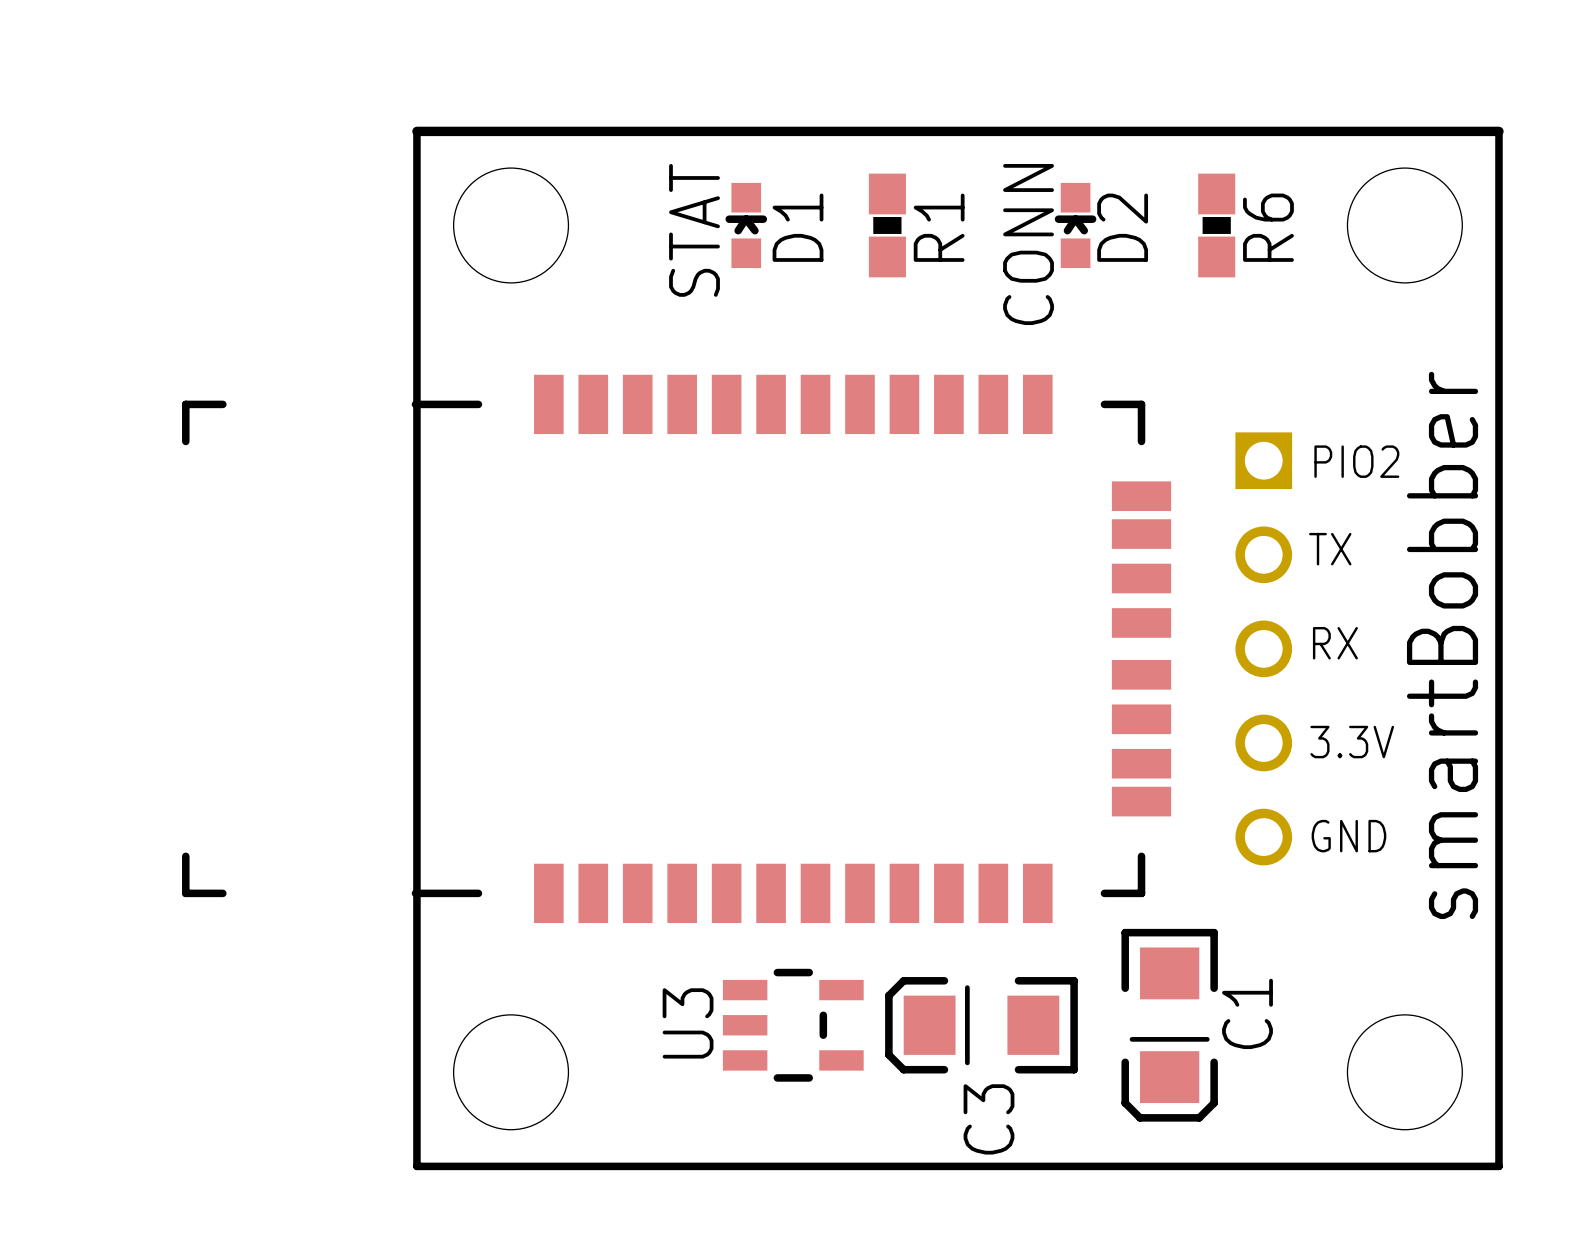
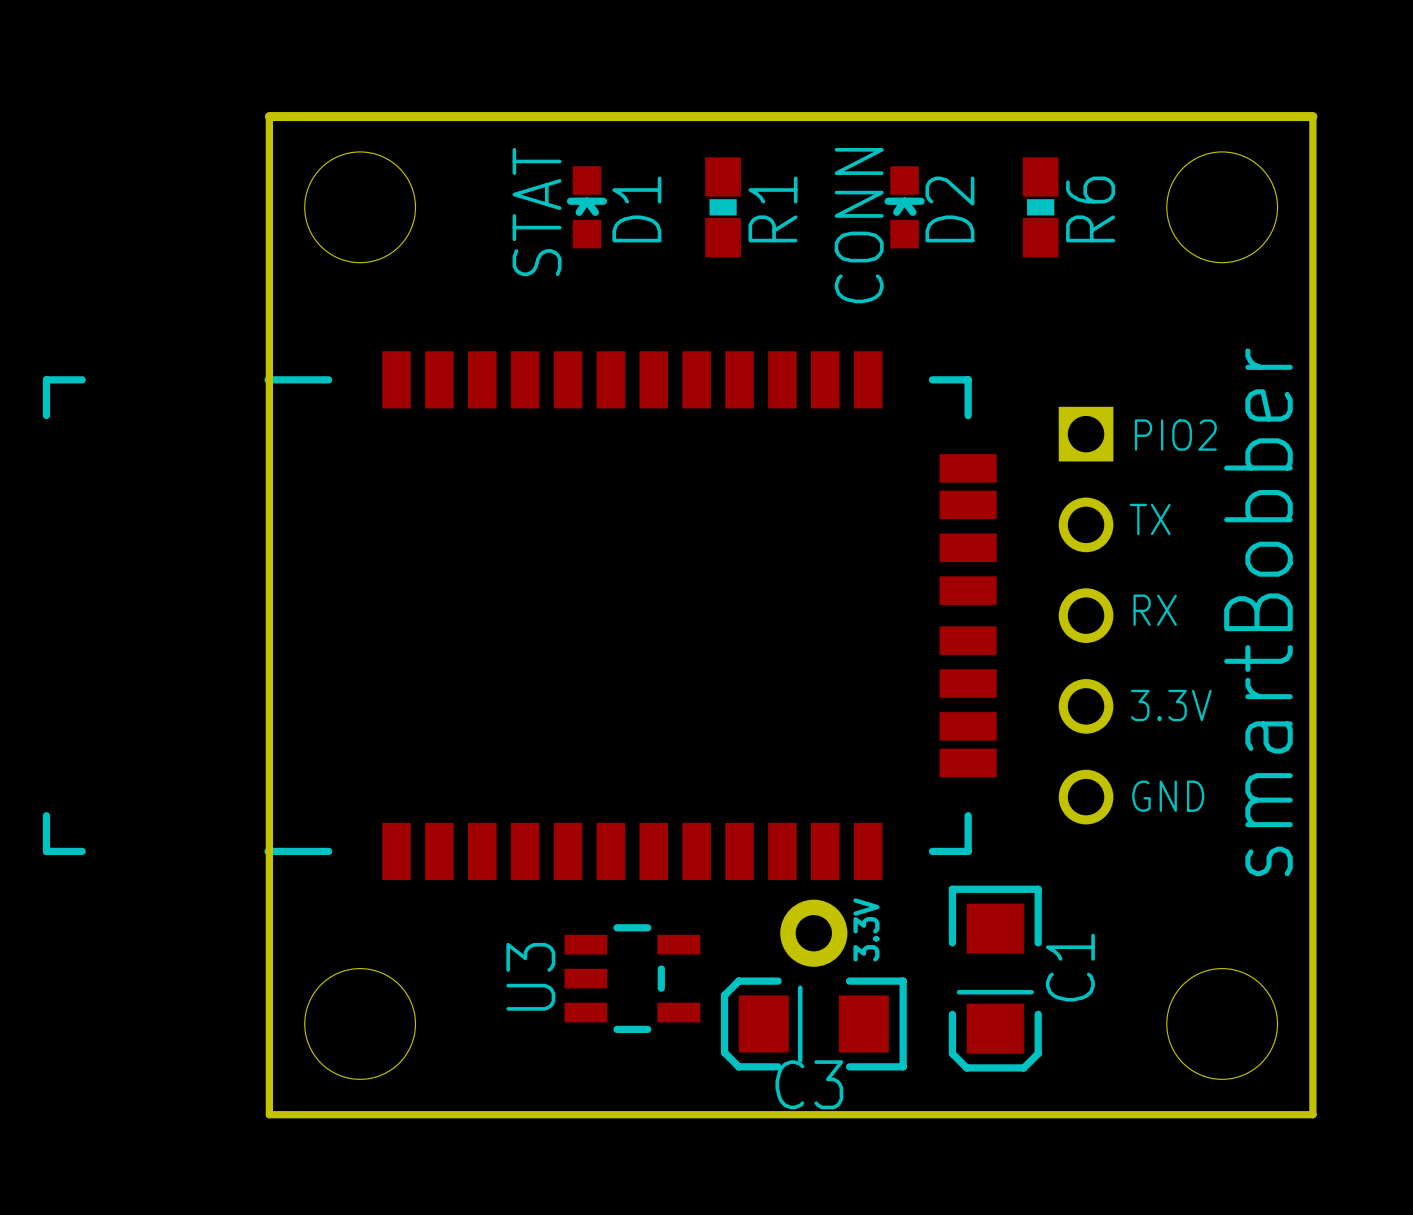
3.3V: none -> (813, 933)
C3 position: (981, 1025) -> (813, 1023)
C3 name rotation: 0° (989, 1119) -> 90° clockwise (809, 1084)

